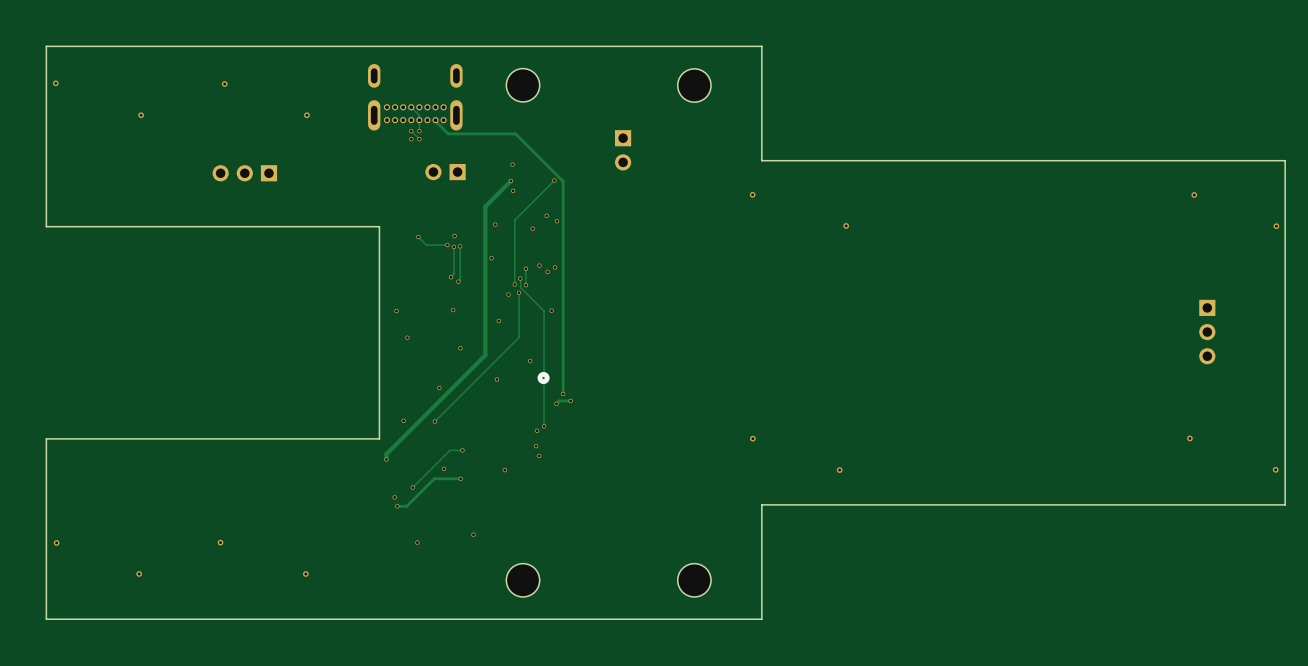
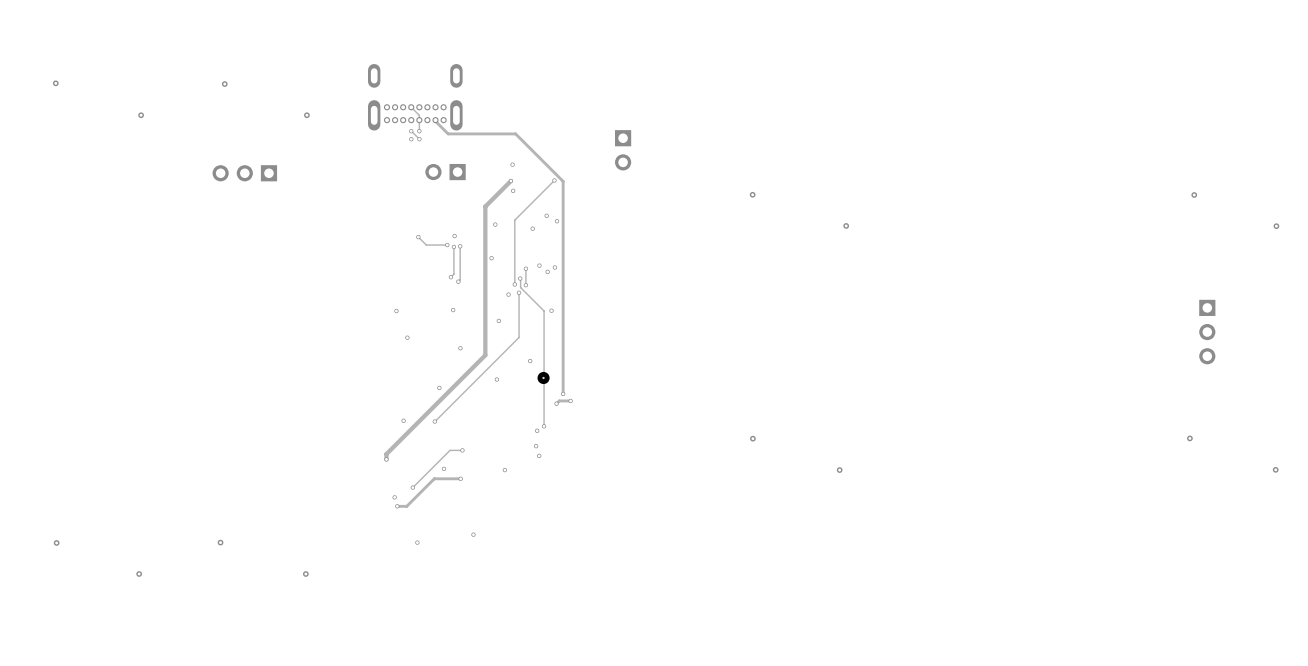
board edge: (761, 46) (761, 160) (1285, 160) (1285, 504) (761, 504) (761, 619) (46, 619) (46, 438) (379, 438) (379, 226) (46, 226) (46, 46) (761, 46) -> none
part: (523, 85) -> none
part: (694, 85) -> none
part: (523, 580) -> none
part: (694, 580) -> none

